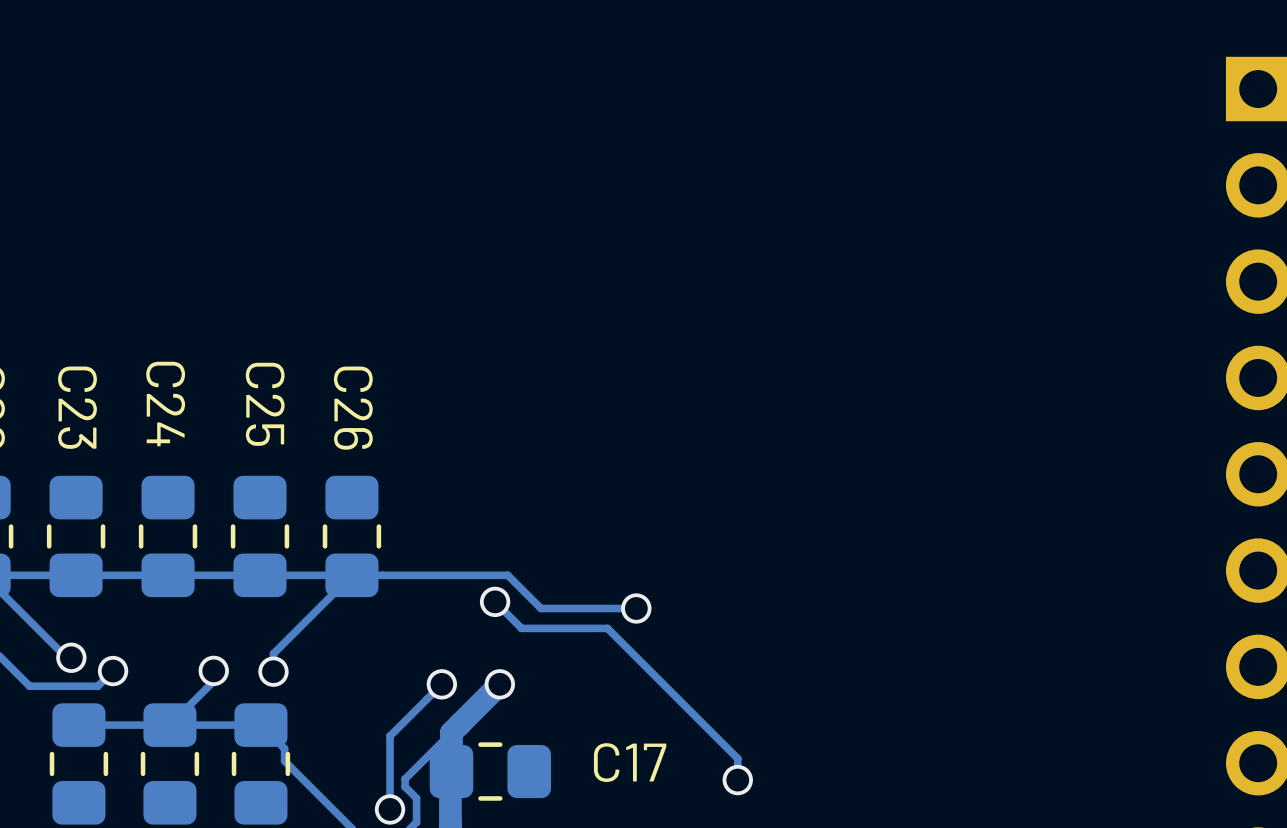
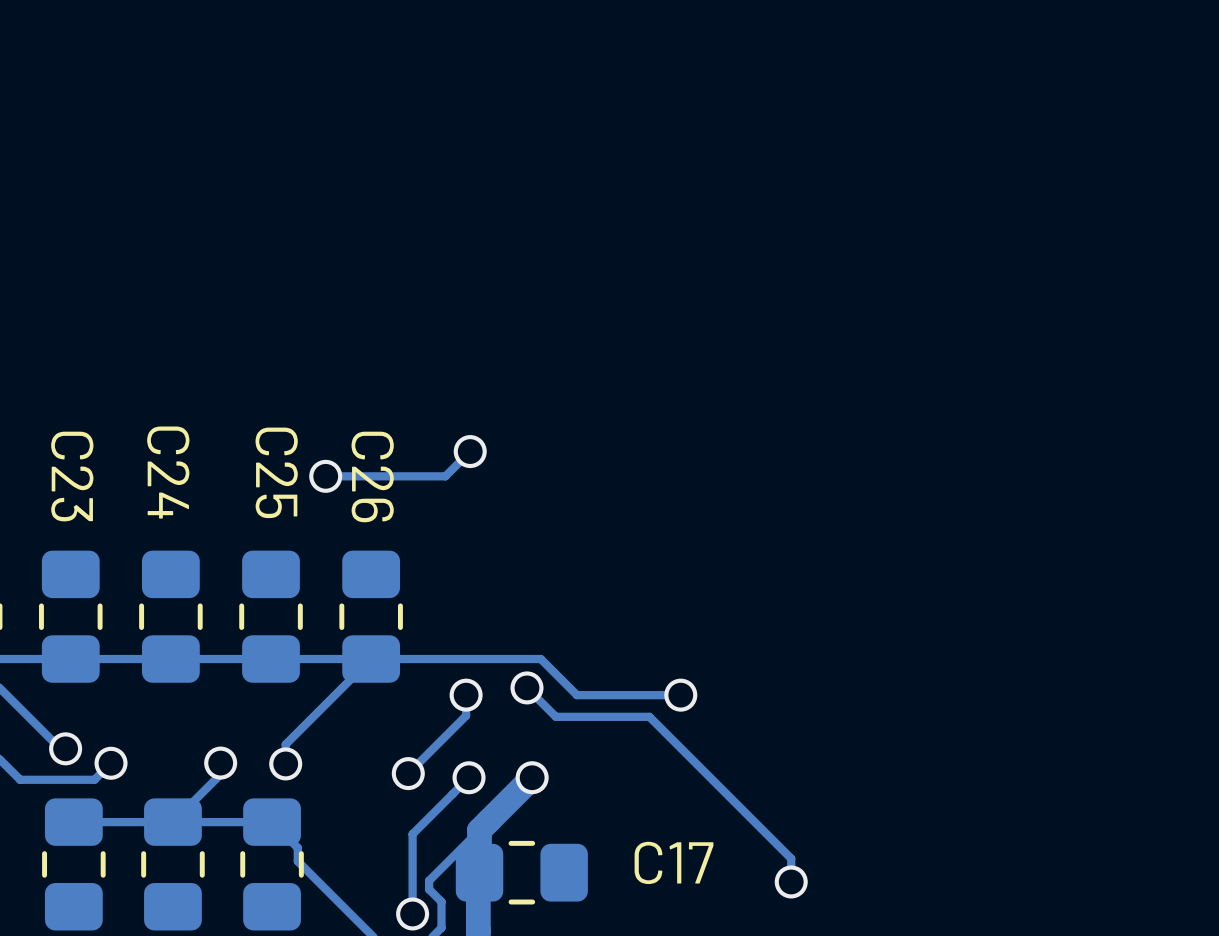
track: none -> (470, 451) (445, 476) (325, 476)
via: none -> (470, 451)
via: none -> (325, 476)
track: none -> (466, 695) (466, 715) (408, 773)
via: none -> (466, 695)
via: none -> (408, 773)

